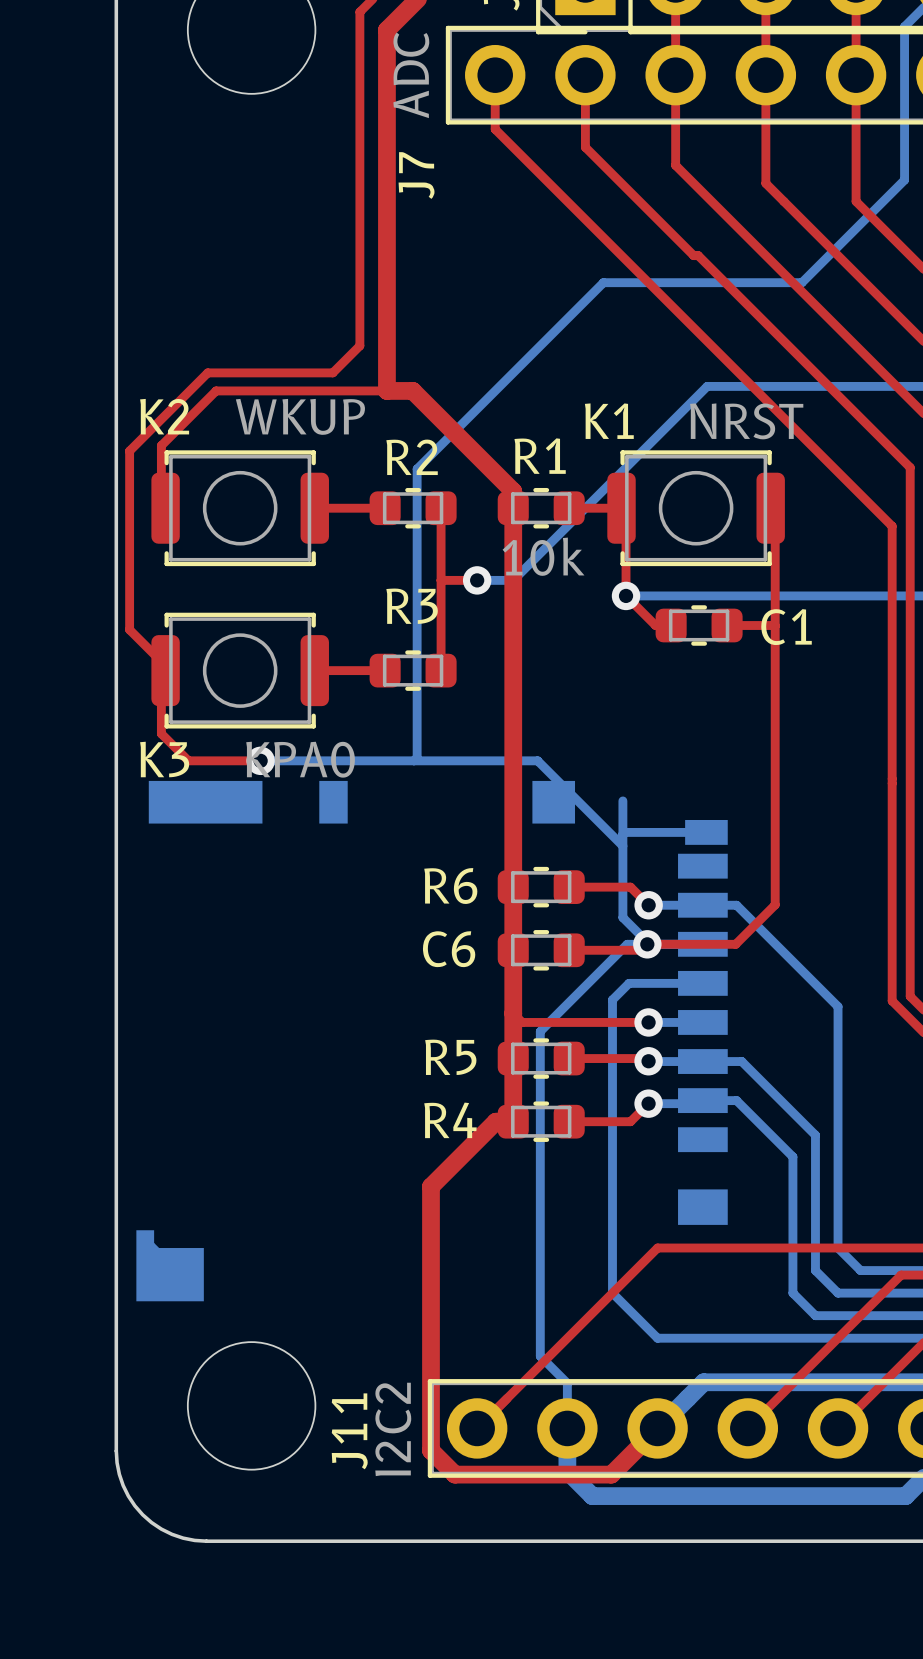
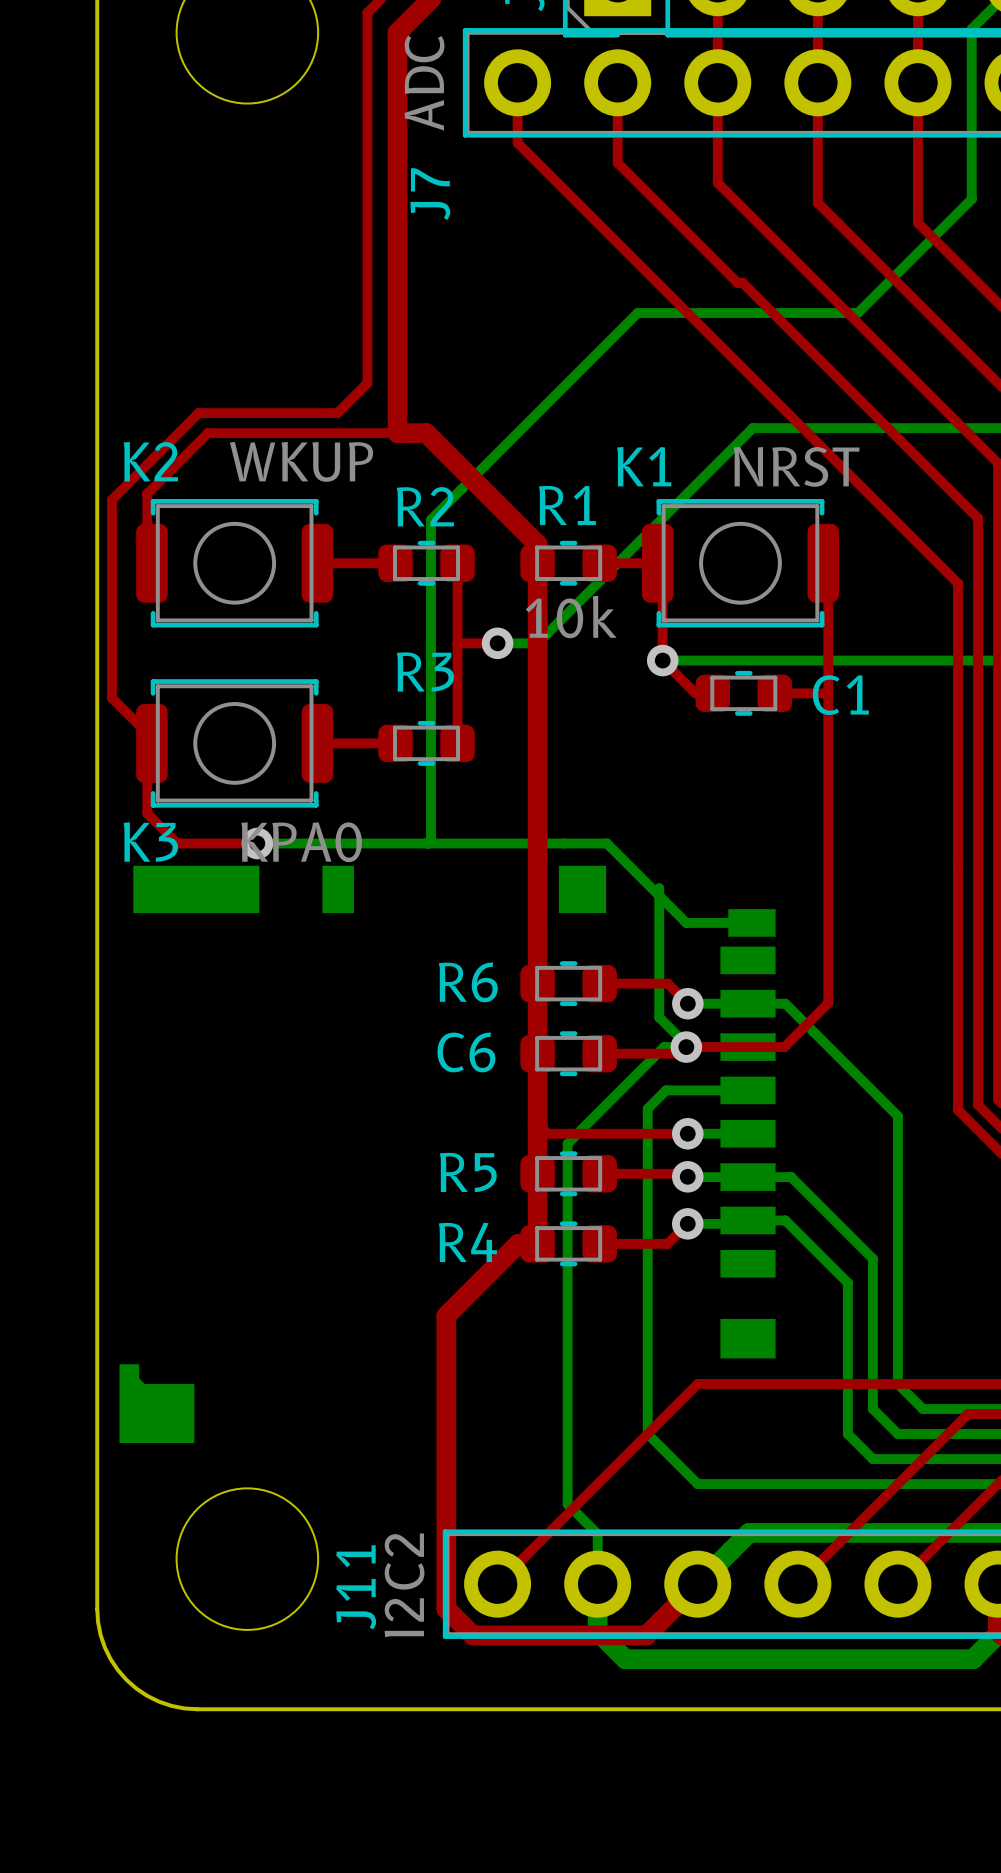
bottom track: (537, 760) (622, 846) -> (564, 843) (606, 843) (686, 922)
bottom track: (647, 832) (624, 832) (622, 834) -> none

